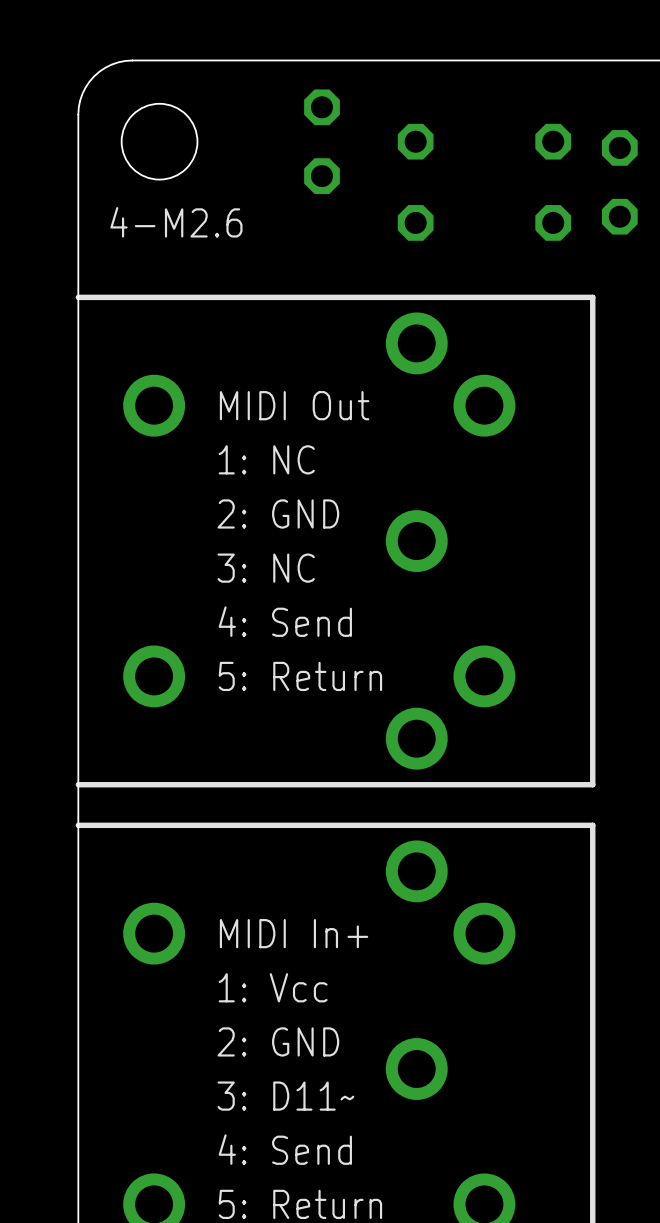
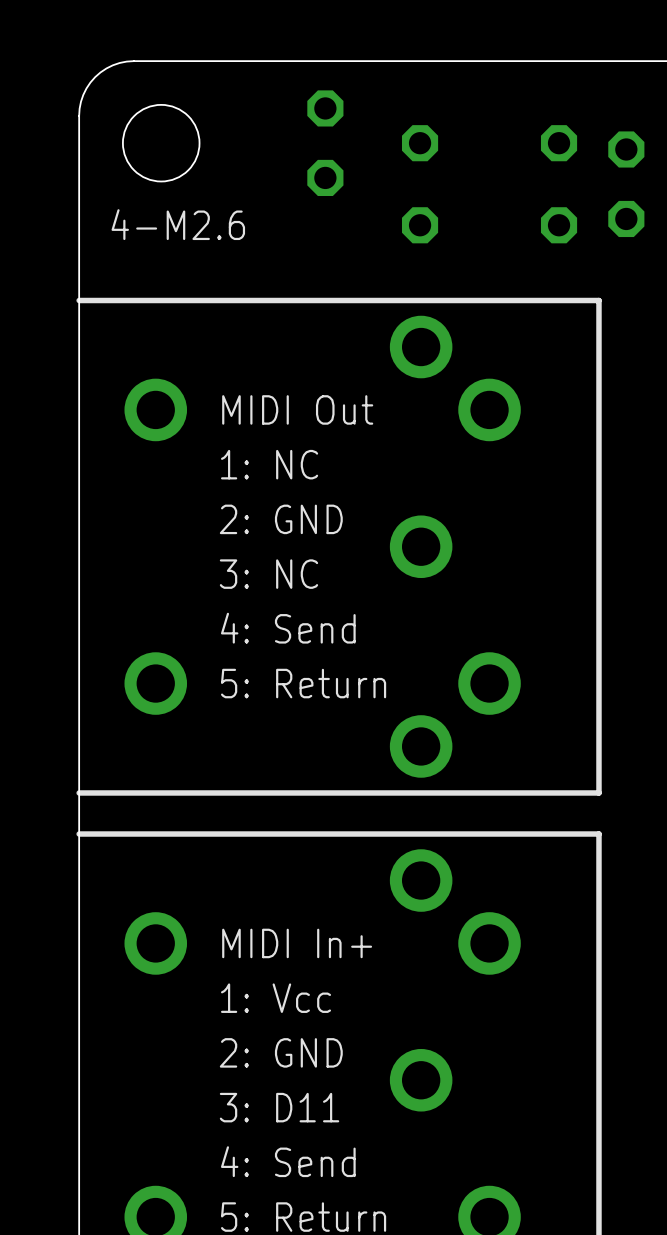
text: 3: D11~ (285, 1096) -> 3: D11 (279, 1107)

